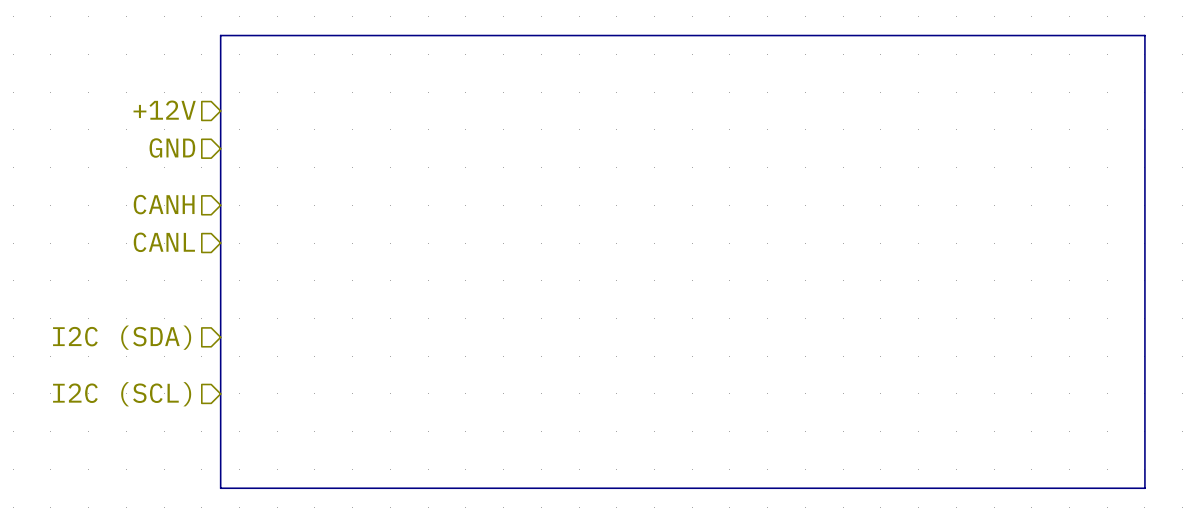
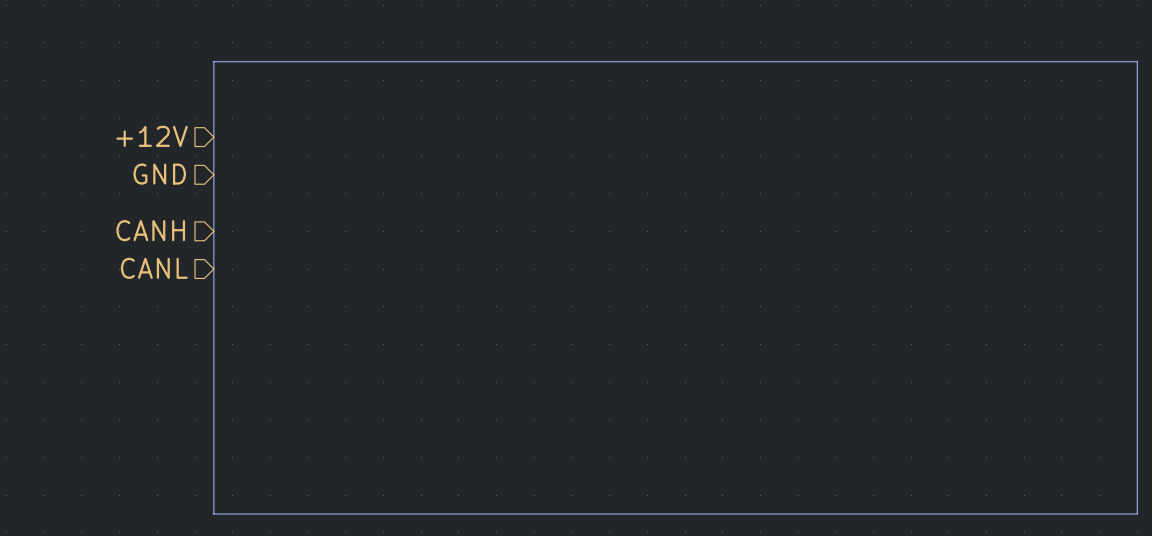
hierarchical label: I2C (SDA) (122, 337) -> none
hierarchical label: I2C (SCL) (122, 394) -> none

